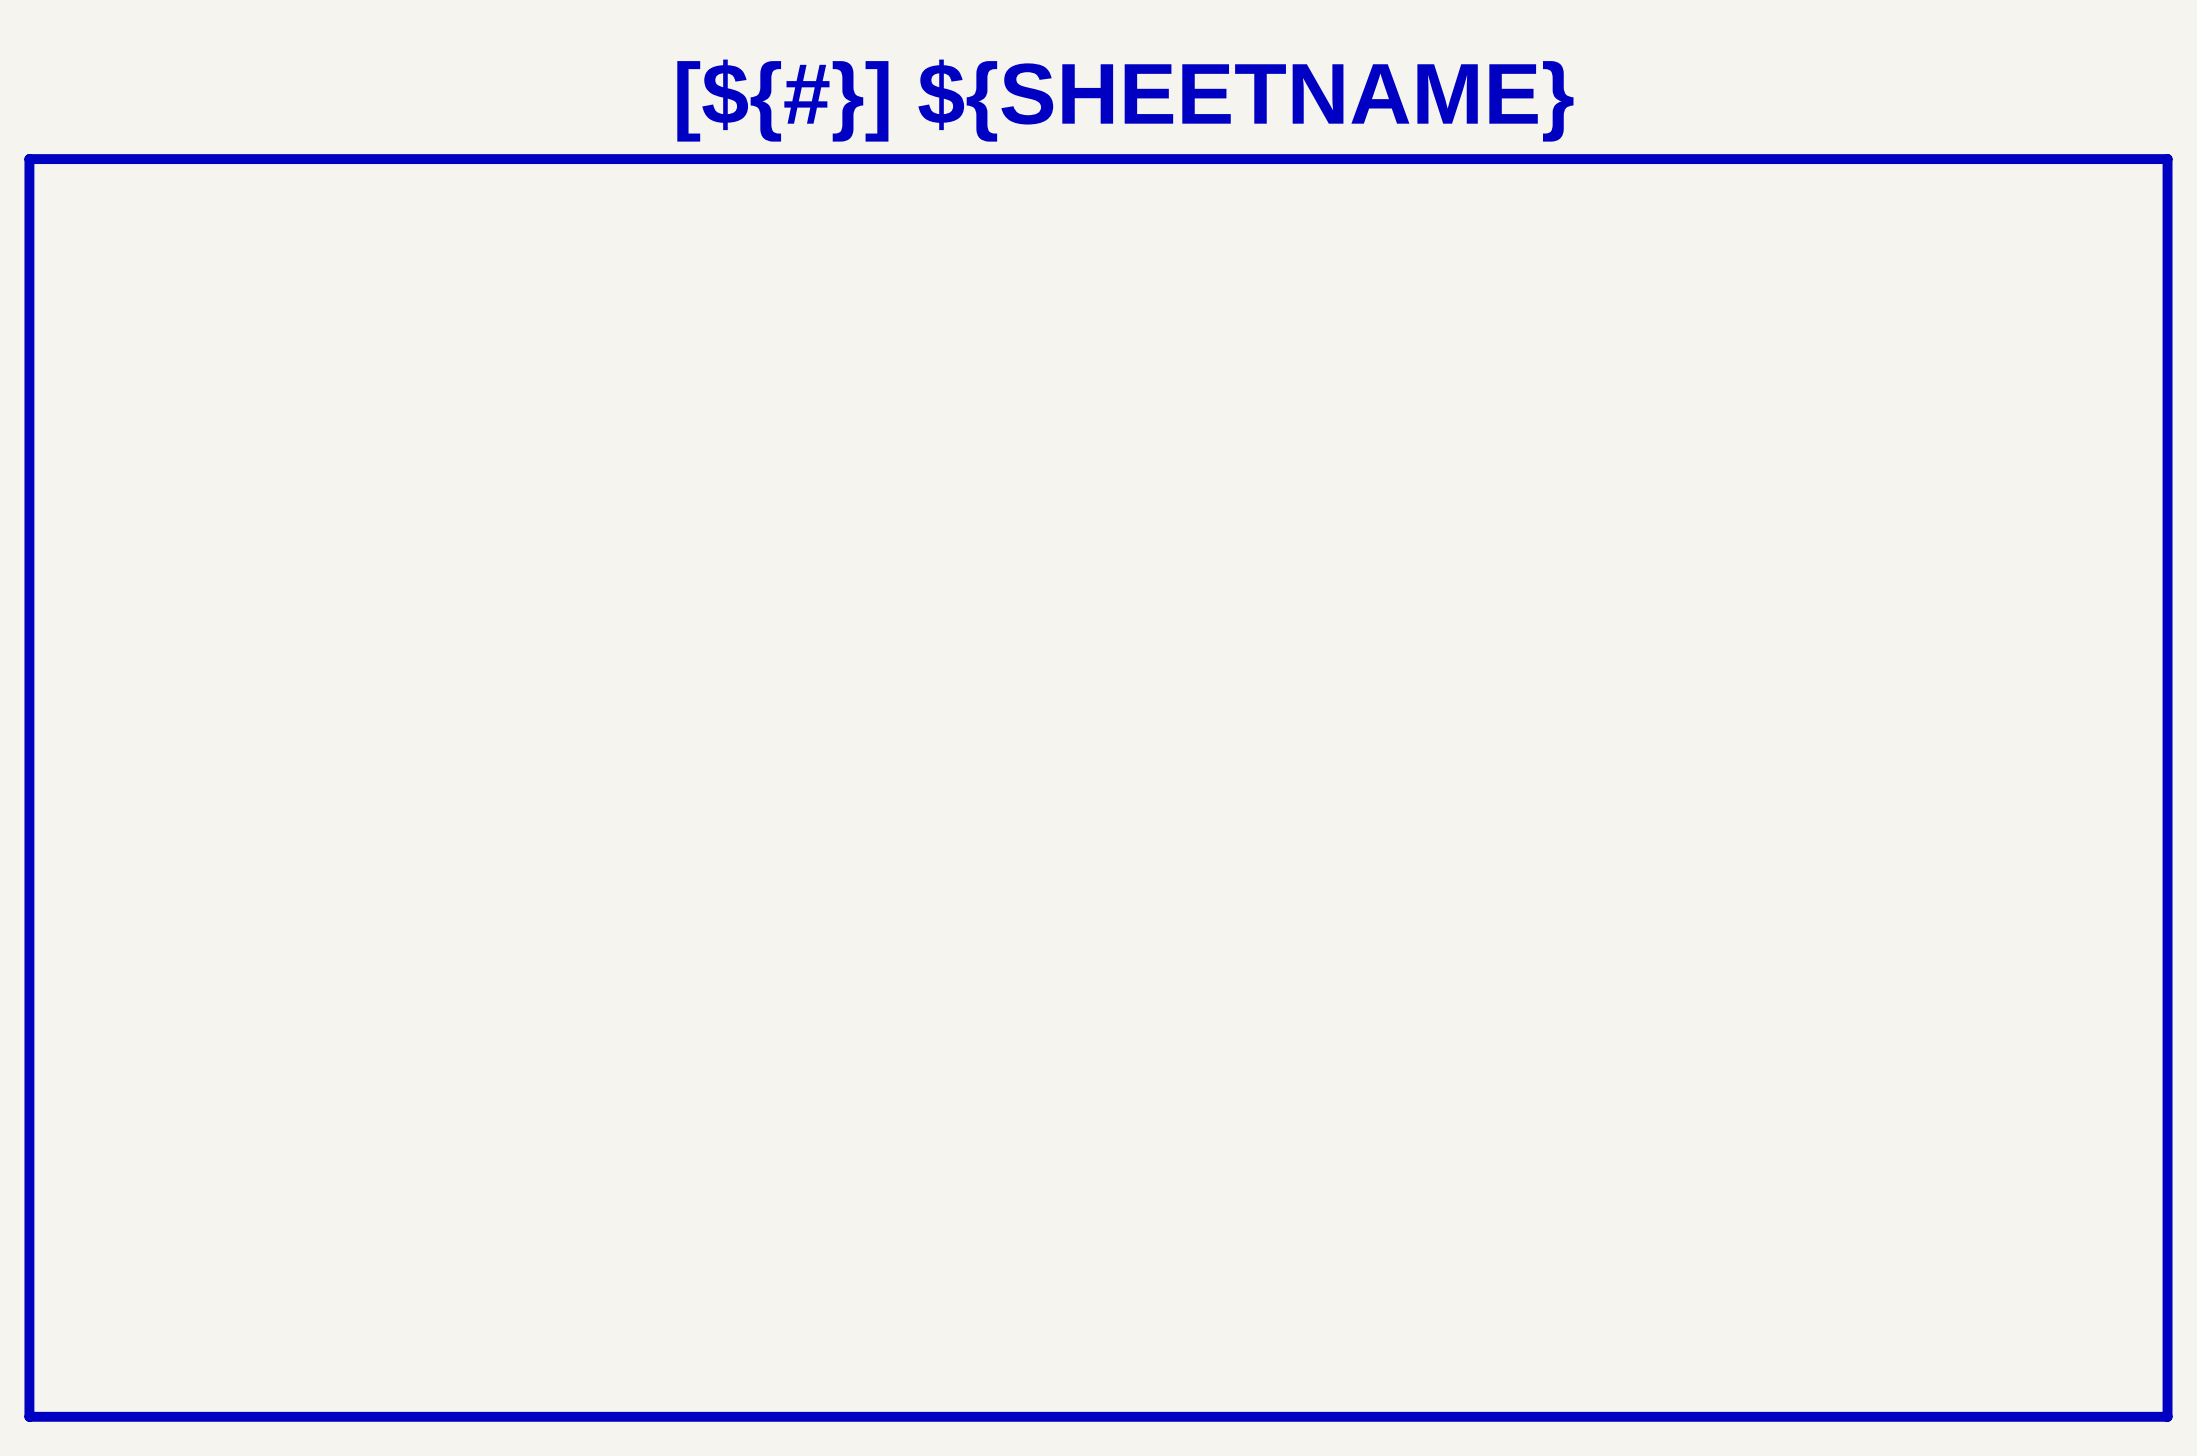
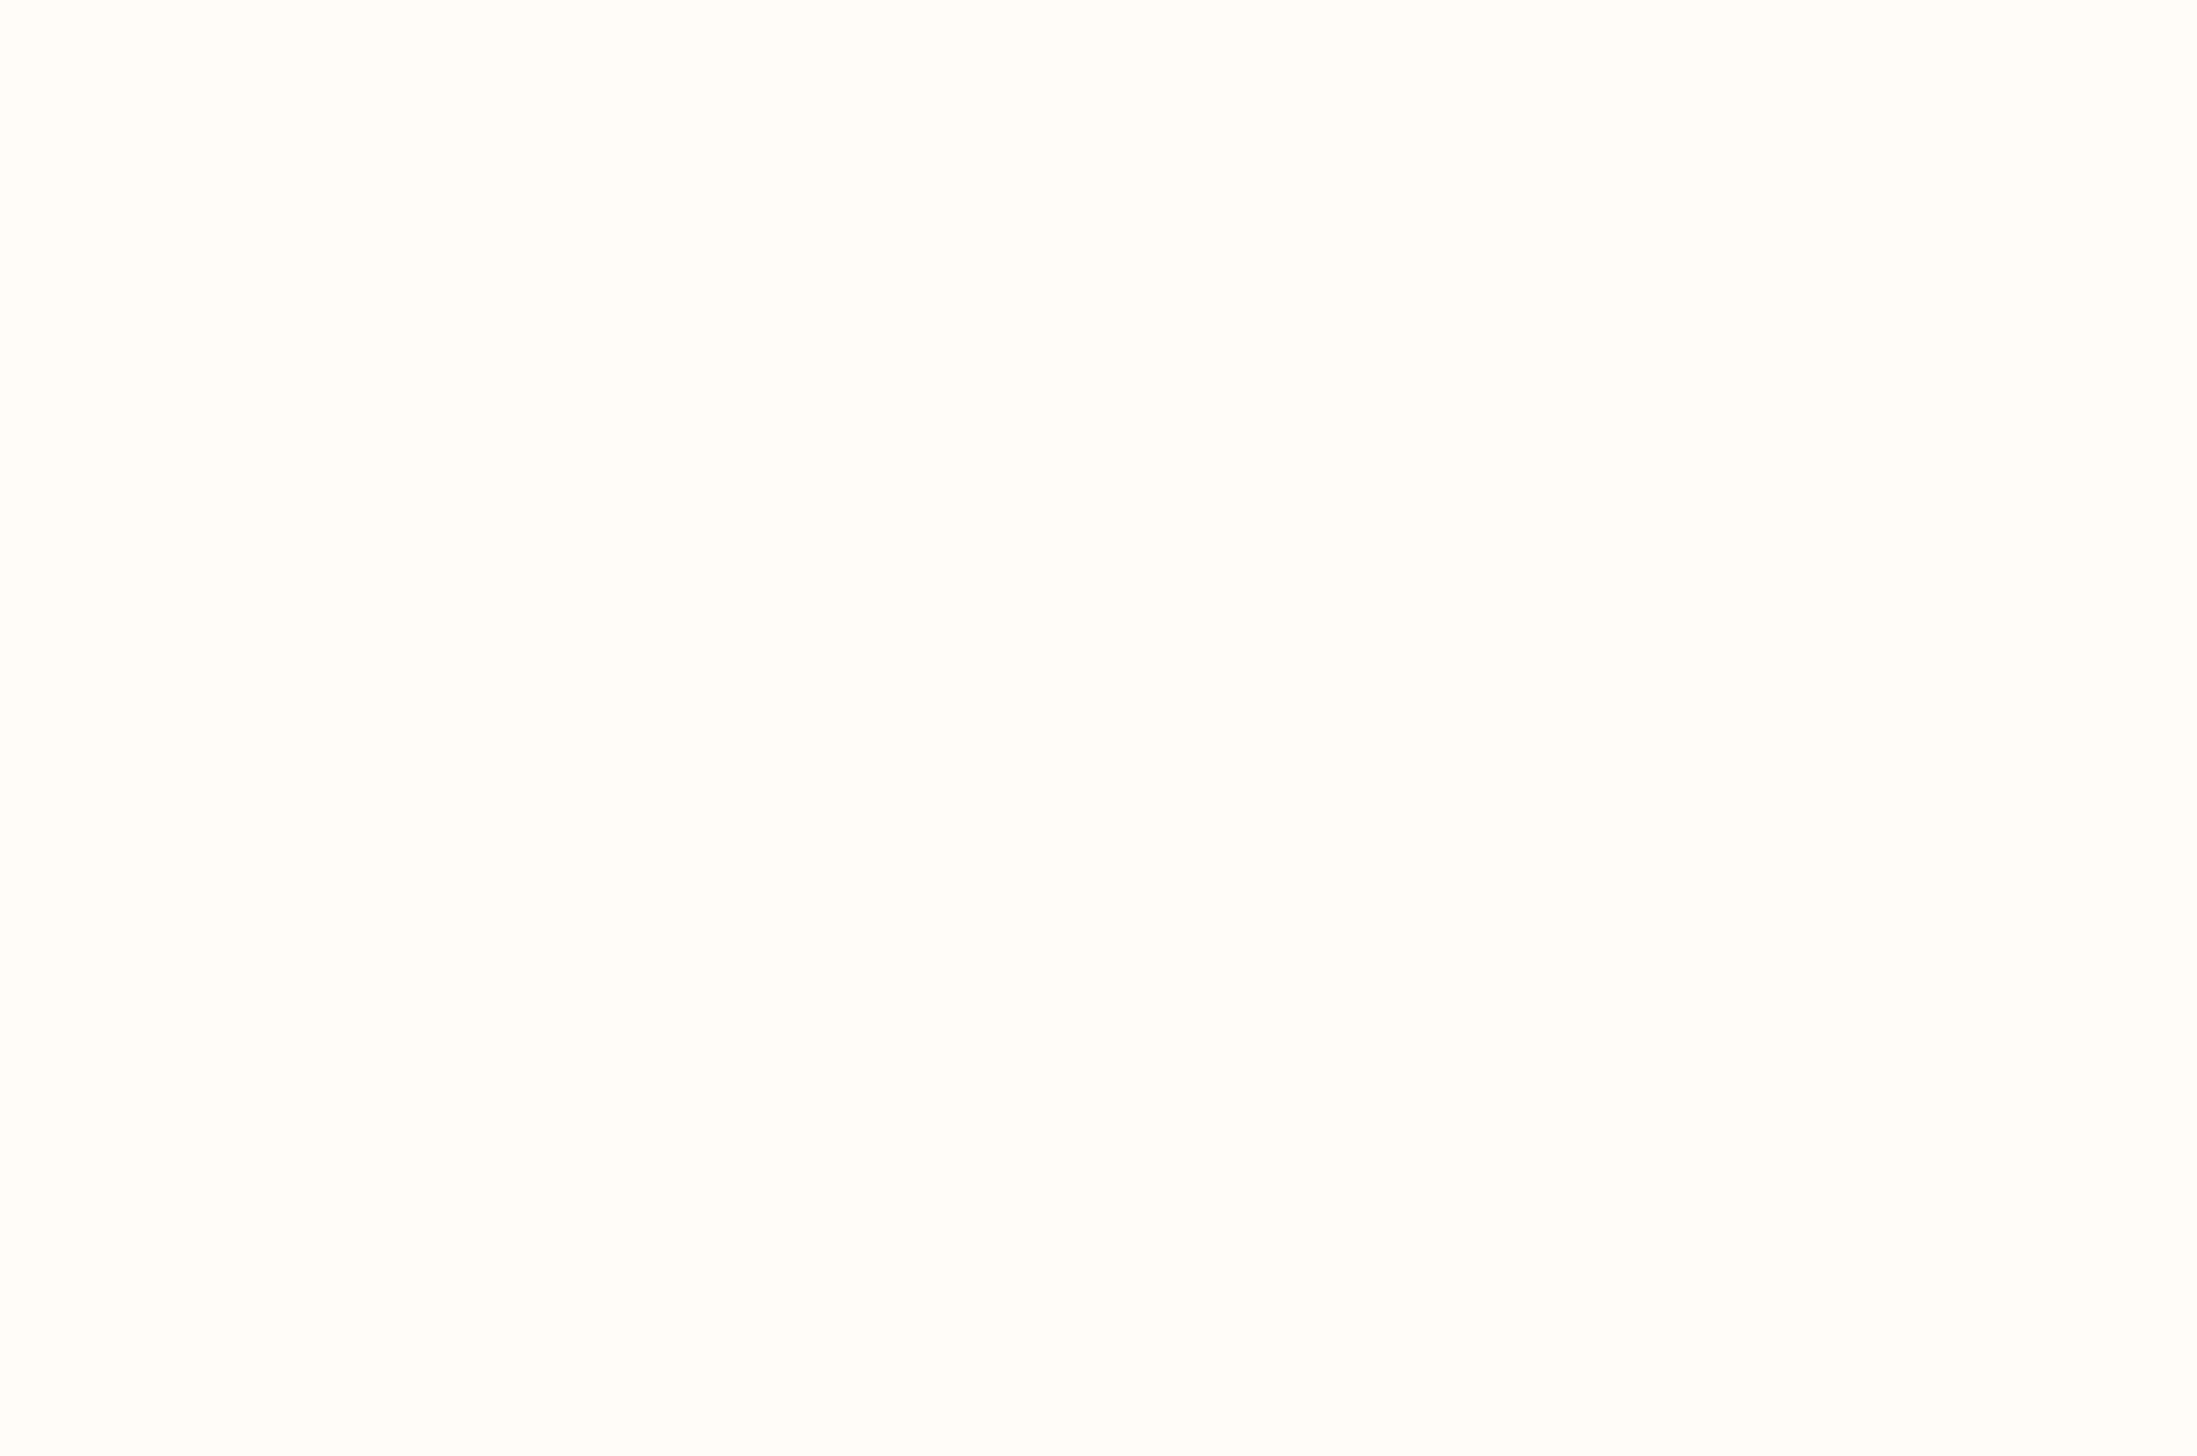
text: [${#}] ${SHEETNAME} (1125, 100) -> none
line: (29, 159) (2167, 159) (2167, 1416) (29, 1416) (29, 159) -> none

